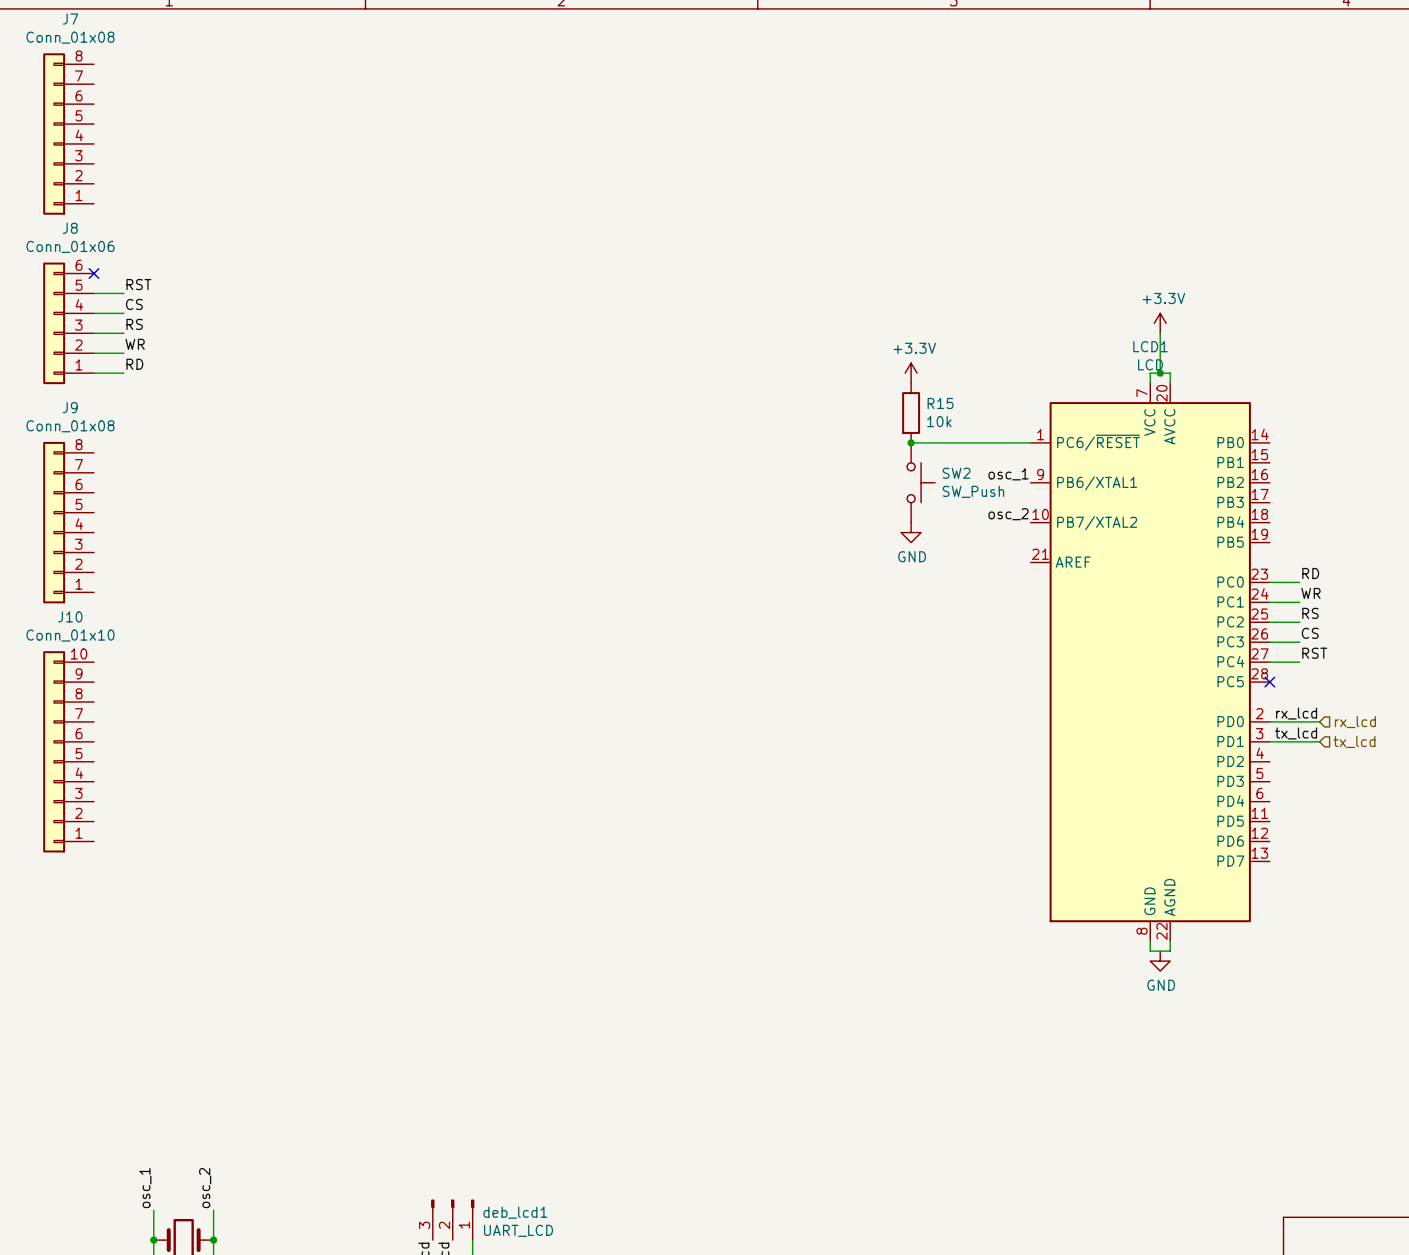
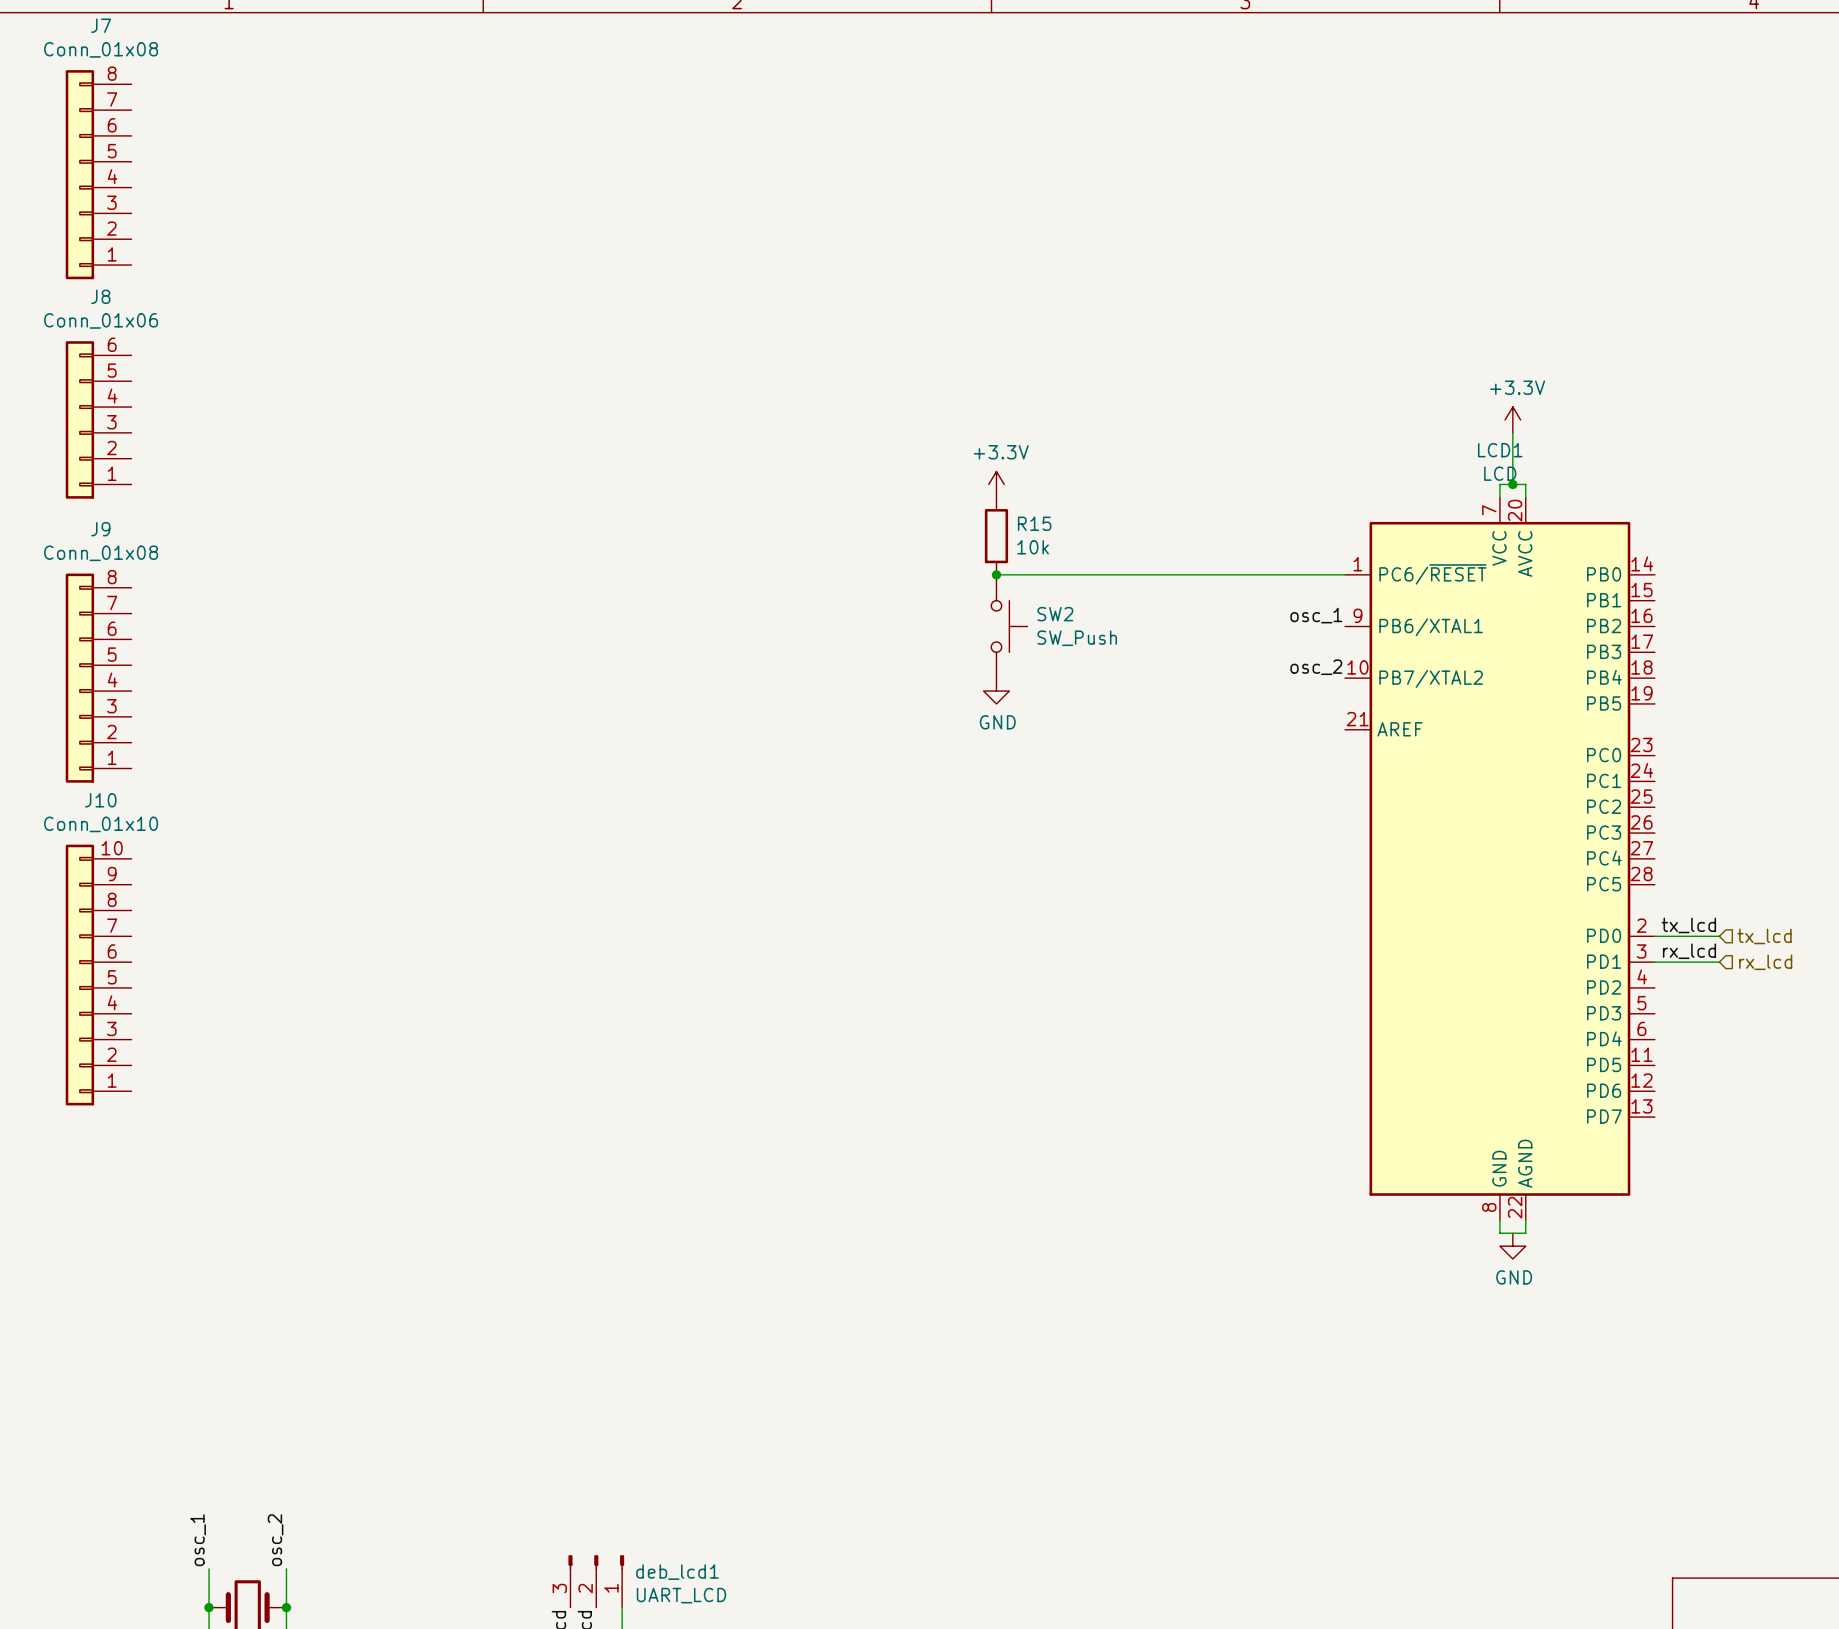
no-connect mark: (94, 273) -> none
label: RST (138, 284) -> none
wire: (94, 293) (123, 293) -> none
label: CS (134, 304) -> none
wire: (94, 313) (123, 313) -> none
label: RS (134, 324) -> none
wire: (94, 333) (123, 333) -> none
label: WR (135, 344) -> none
wire: (94, 353) (123, 353) -> none
label: RD (134, 364) -> none
wire: (94, 373) (123, 373) -> none
power symbol position: +3.3V (911, 373) -> +3.3V (996, 484)
R15 position: (911, 413) -> (996, 536)
wire: none -> (996, 574) (1190, 574)
junction: none -> (996, 574)
junction: (911, 442) -> none
SW2 position: (921, 482) -> (1009, 626)
power symbol position: GND (911, 532) -> GND (996, 691)
label: RD (1310, 573) -> none
wire: (1269, 582) (1299, 582) -> none
label: WR (1310, 593) -> none
wire: (1269, 602) (1299, 602) -> none
label: RS (1310, 613) -> none
wire: (1269, 622) (1299, 622) -> none
label: CS (1310, 633) -> none
wire: (1269, 642) (1299, 642) -> none
label: RST (1314, 653) -> none
wire: (1269, 662) (1299, 662) -> none
no-connect mark: (1269, 682) -> none
label: rx_lcd (1296, 713) -> tx_lcd (1688, 925)
hierarchical label: rx_lcd (1355, 722) -> tx_lcd (1764, 936)
label: tx_lcd (1296, 733) -> rx_lcd (1689, 951)
hierarchical label: tx_lcd (1354, 741) -> rx_lcd (1765, 962)

